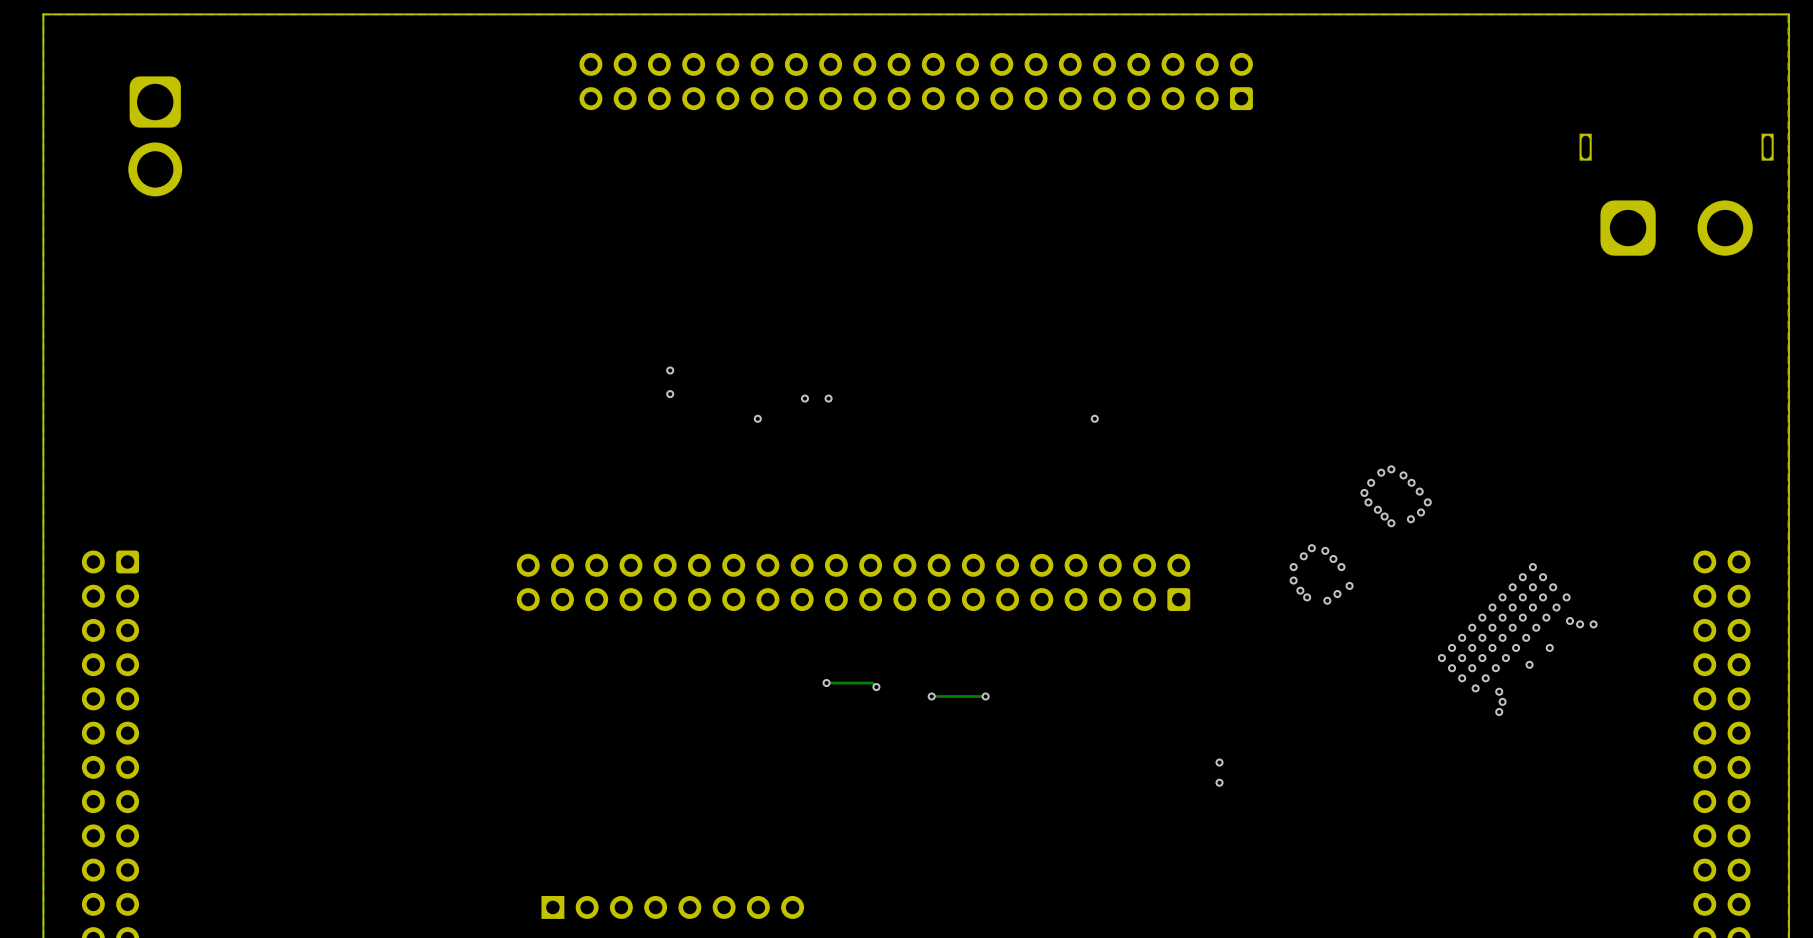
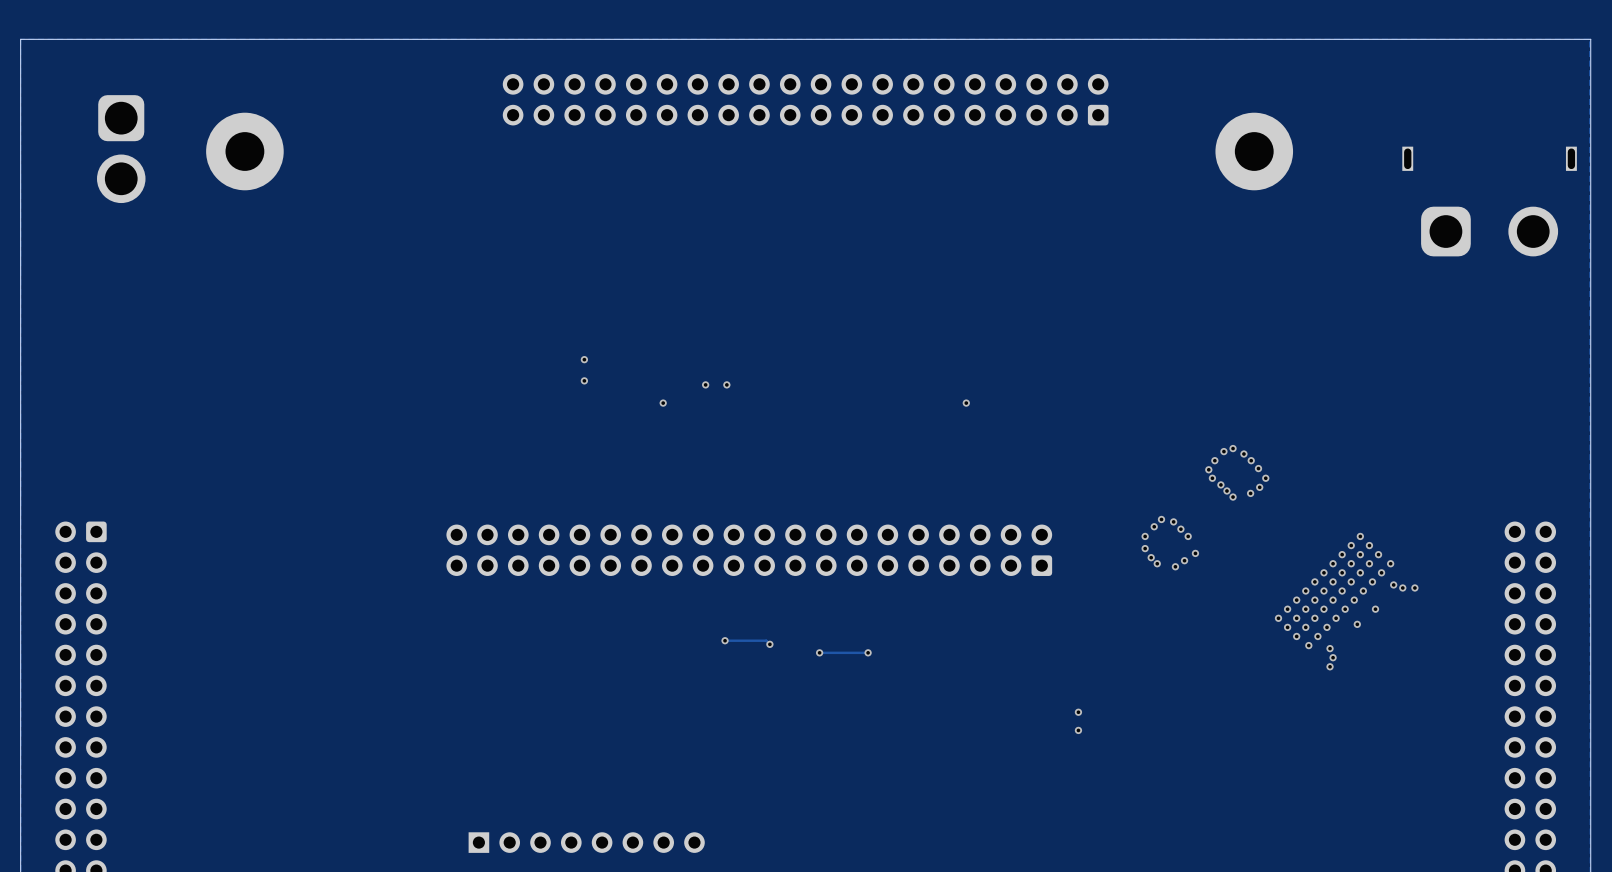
part: none -> (244, 151)
part: none -> (1254, 151)

